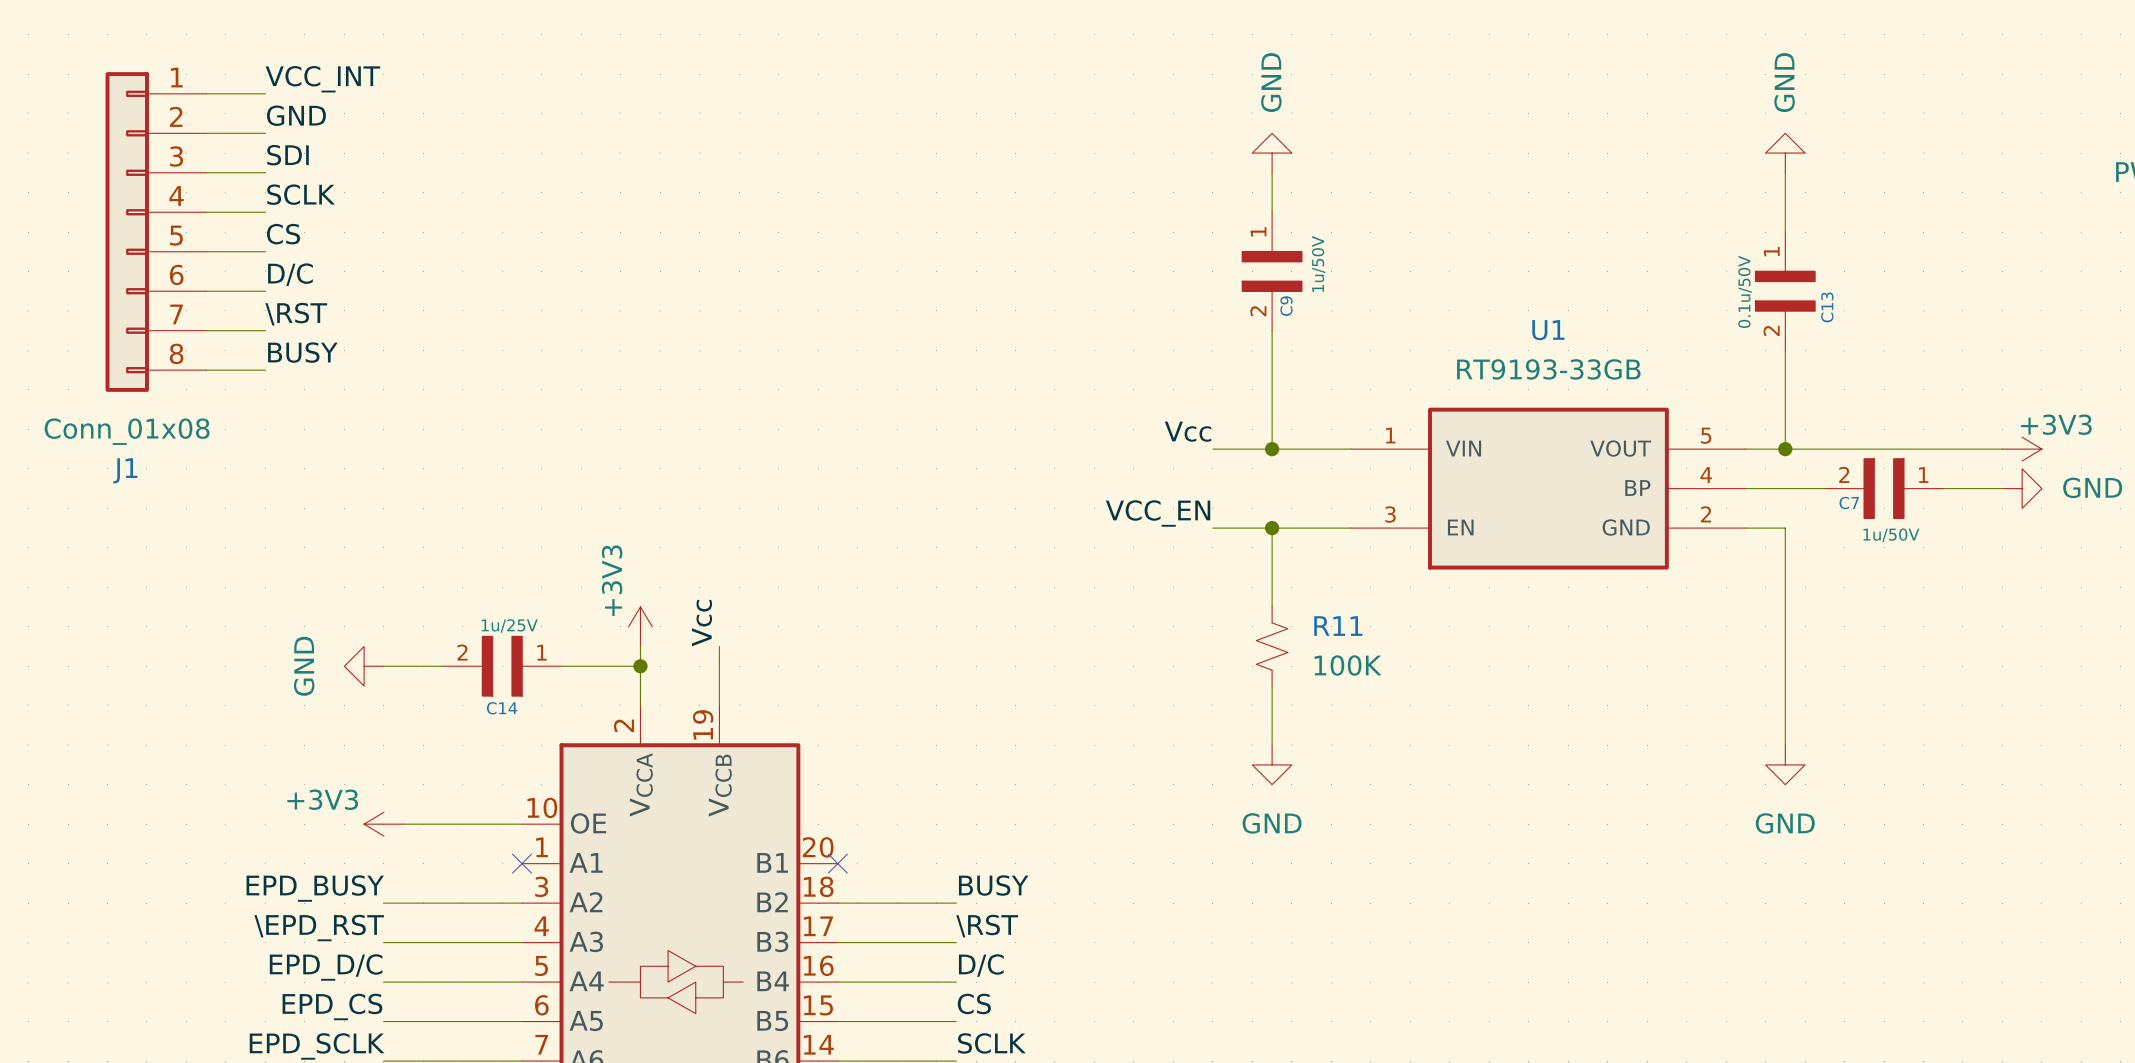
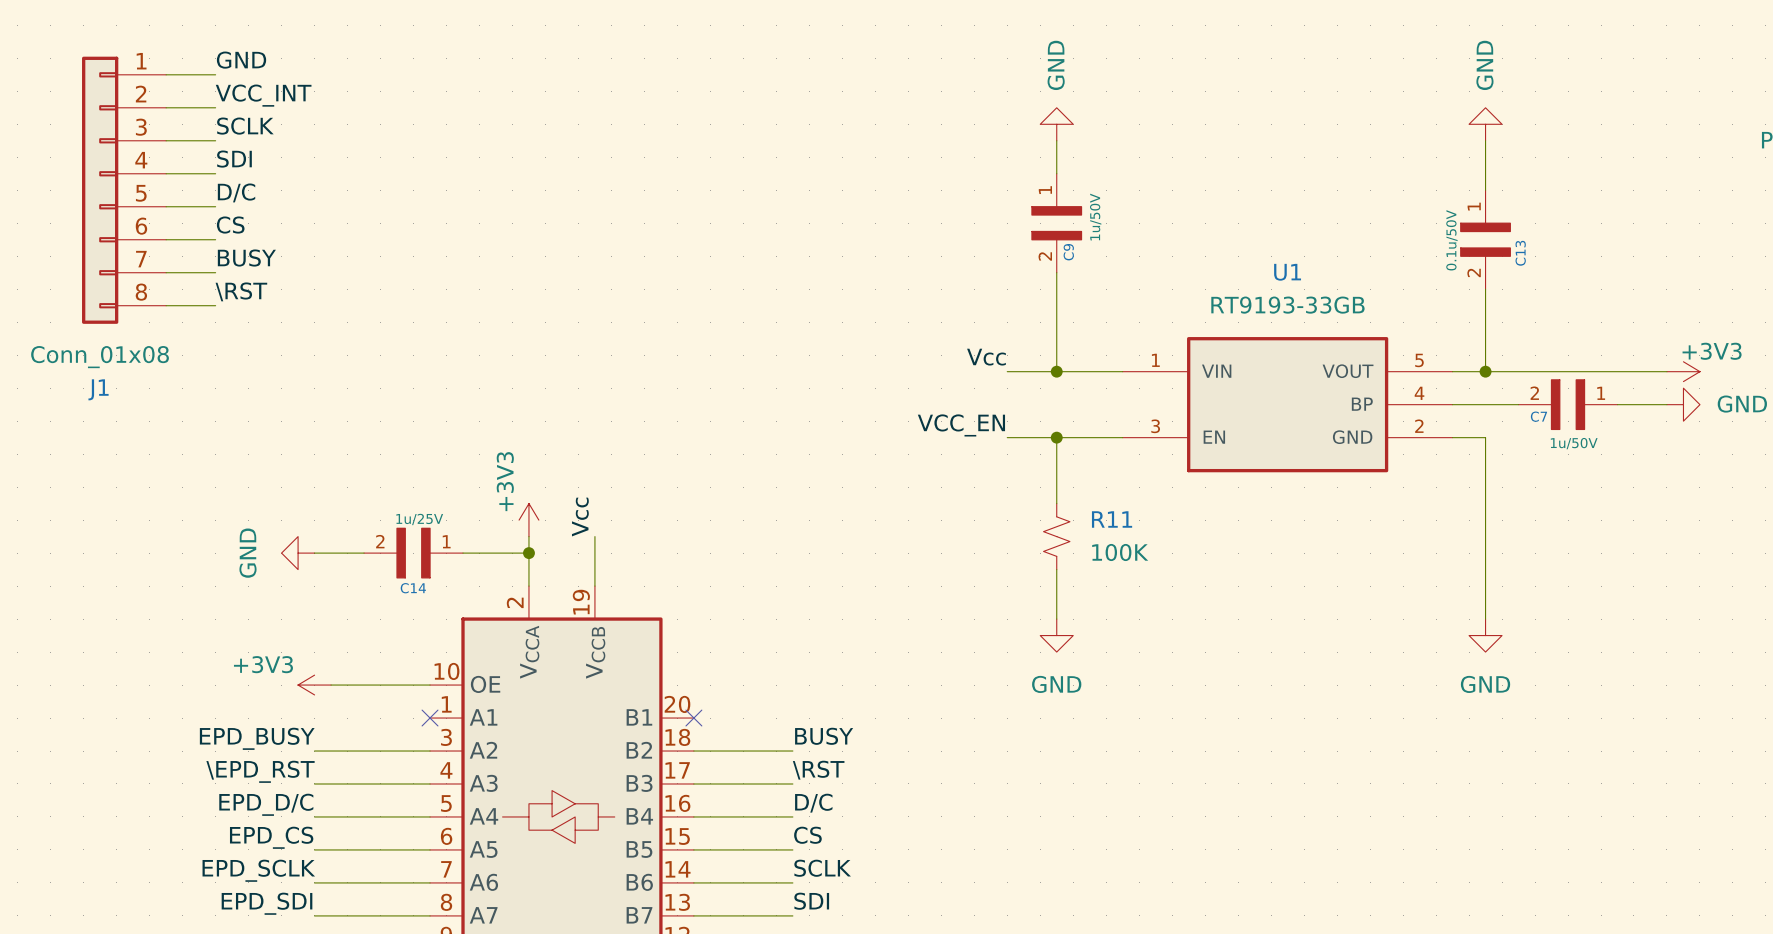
label: VCC_INT (322, 79) -> GND (241, 60)
label: GND (296, 115) -> VCC_INT (263, 95)
label: SDI (288, 155) -> SCLK (245, 126)
label: SCLK (301, 194) -> SDI (234, 159)
label: CS (283, 234) -> D/C (236, 192)
label: D/C (290, 274) -> CS (230, 225)
label: \RST (296, 314) -> BUSY (246, 258)
label: BUSY (302, 352) -> \RST (241, 291)

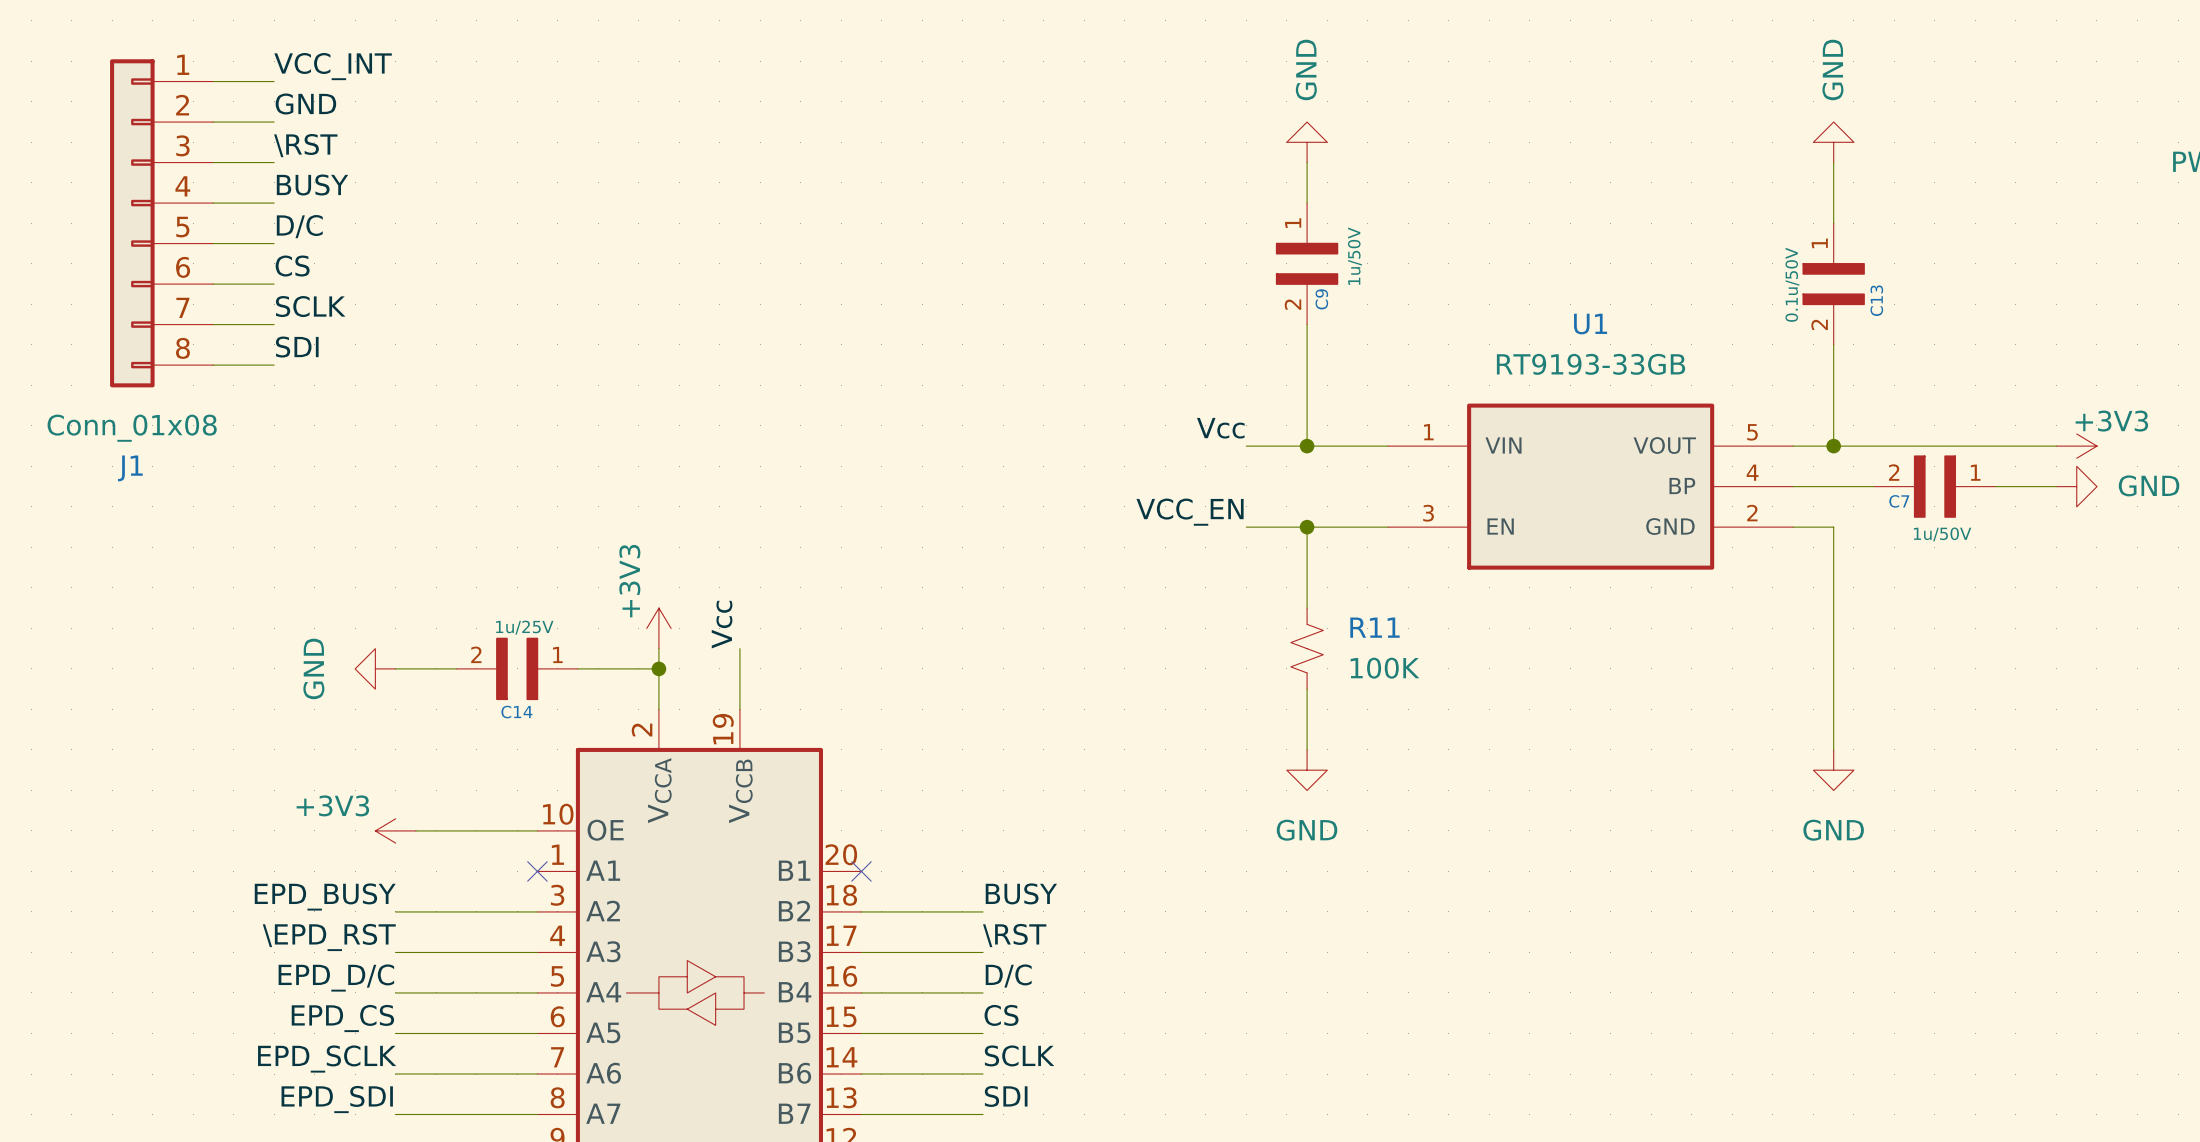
label: GND (241, 60) -> VCC_INT (333, 66)
label: VCC_INT (263, 95) -> GND (305, 103)
label: SCLK (245, 126) -> \RST (305, 145)
label: SDI (234, 159) -> BUSY (312, 185)
label: BUSY (246, 258) -> SCLK (310, 306)
label: \RST (241, 291) -> SDI (297, 347)

